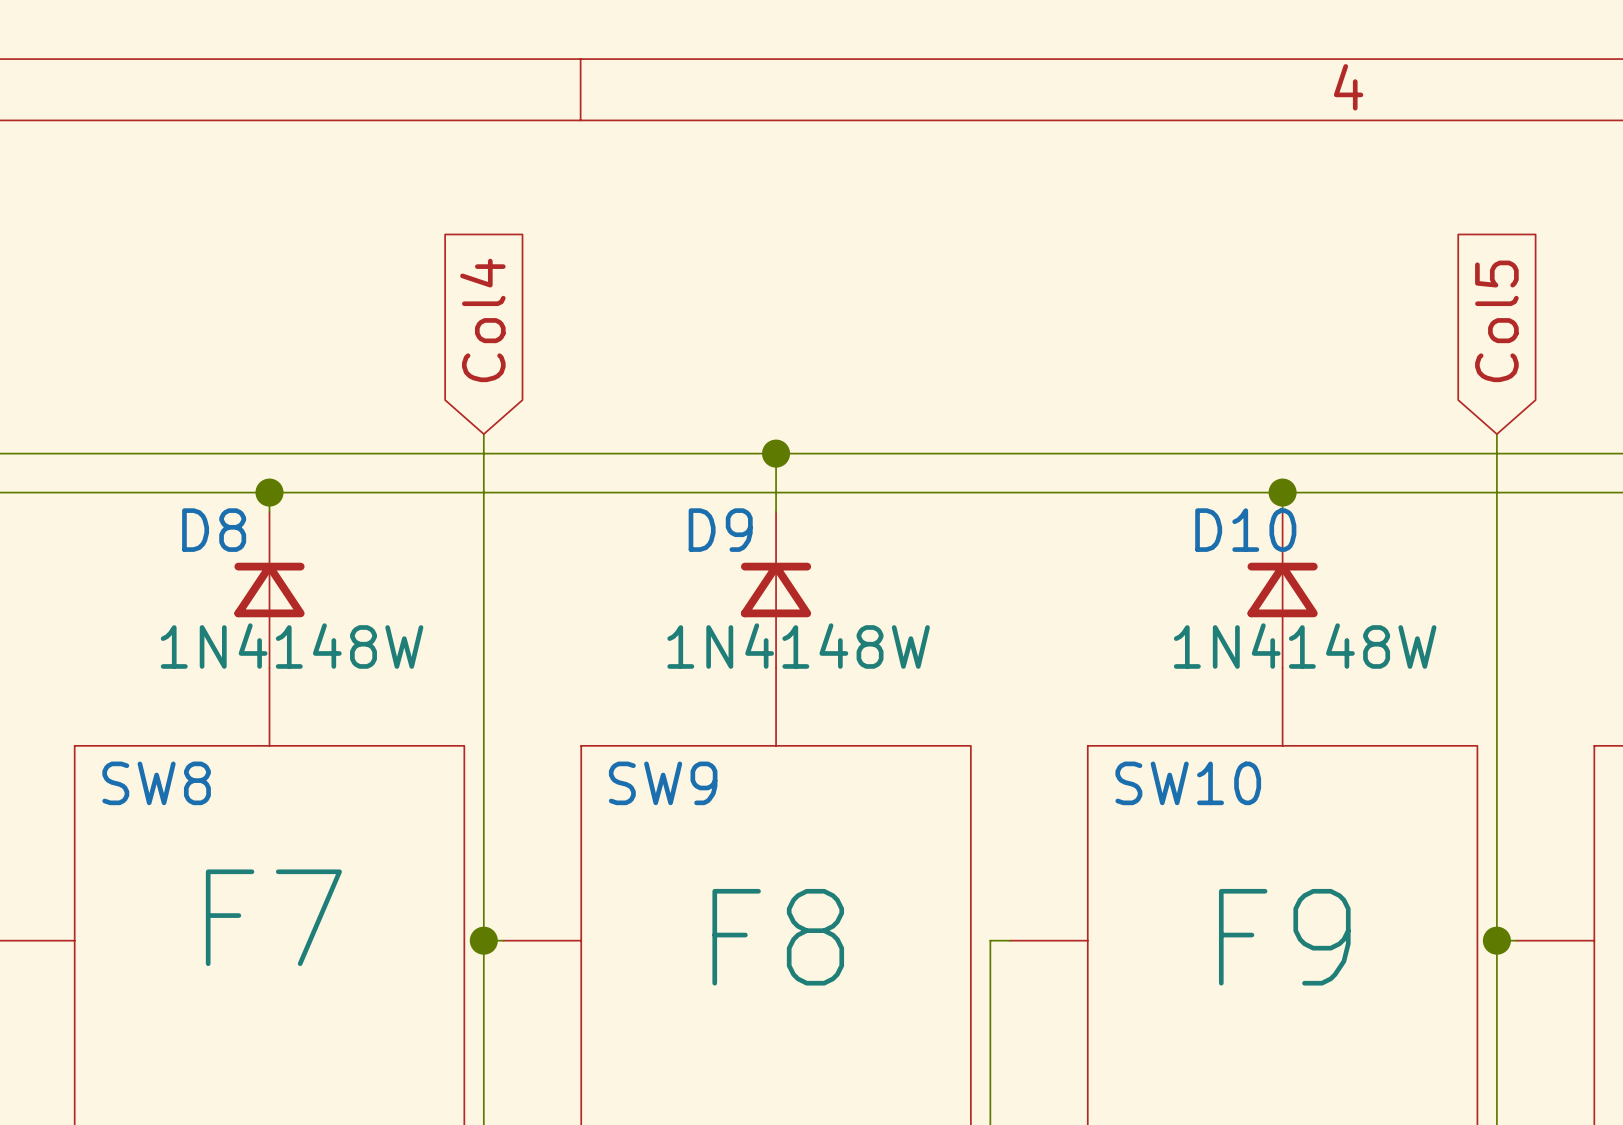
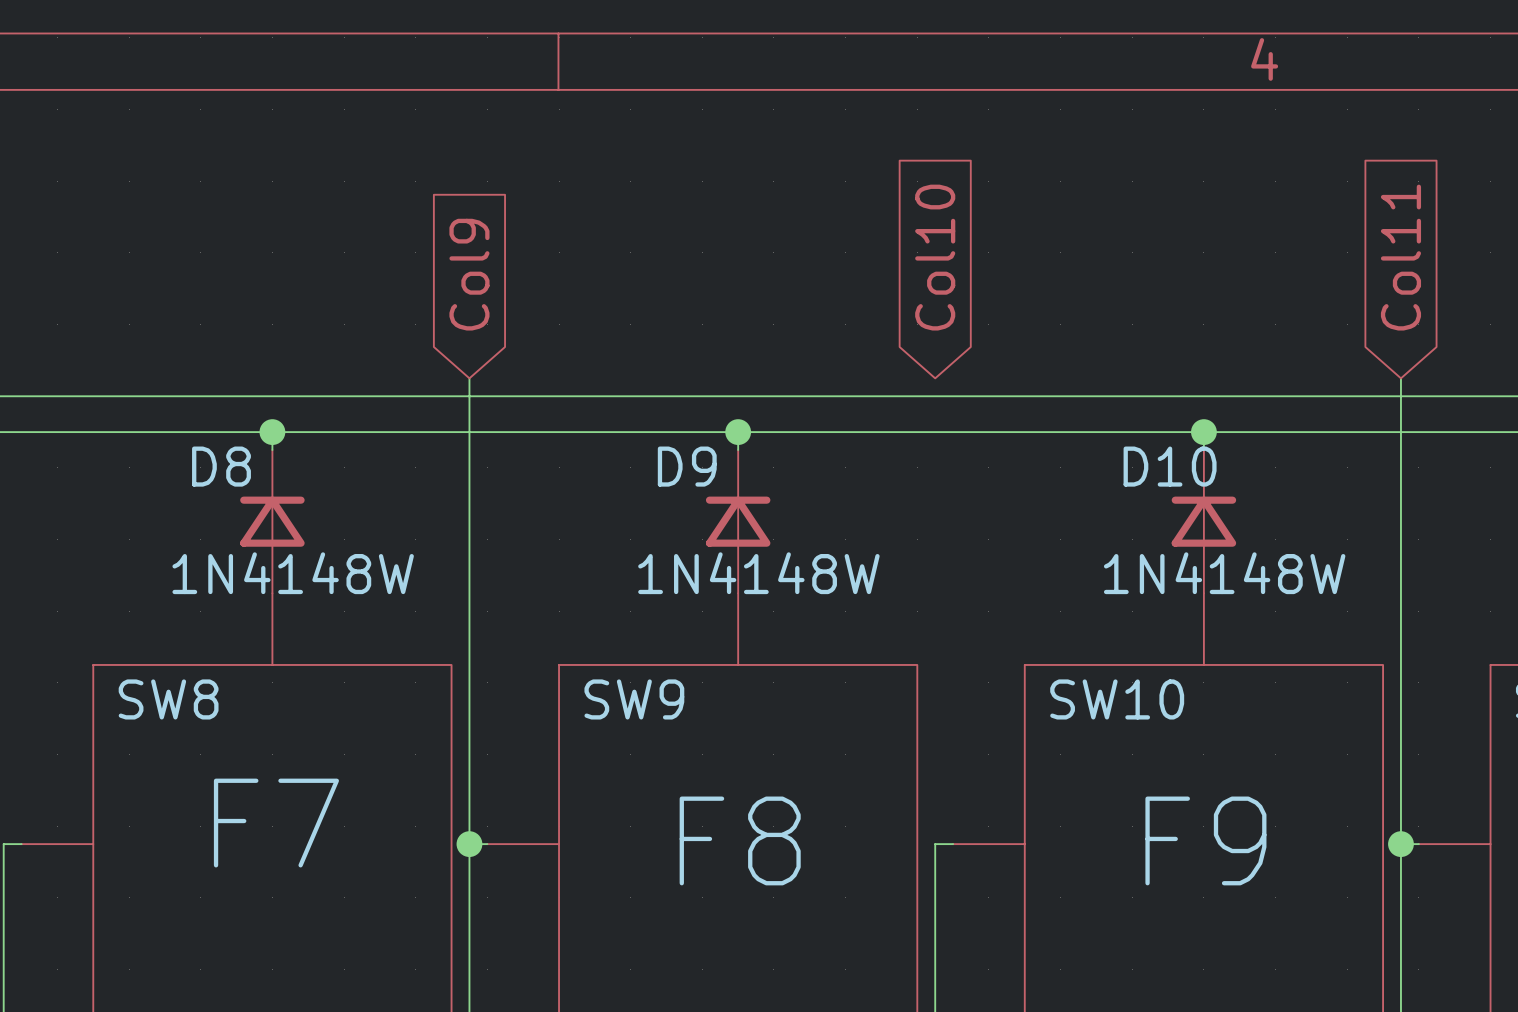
global label: none -> Col10 (935, 257)
global label: Col4 (482, 320) -> Col9 (469, 274)
global label: Col5 (1496, 321) -> Col11 (1400, 257)
wire: (776, 453) (776, 492) -> none
junction position: (776, 453) -> (738, 432)

